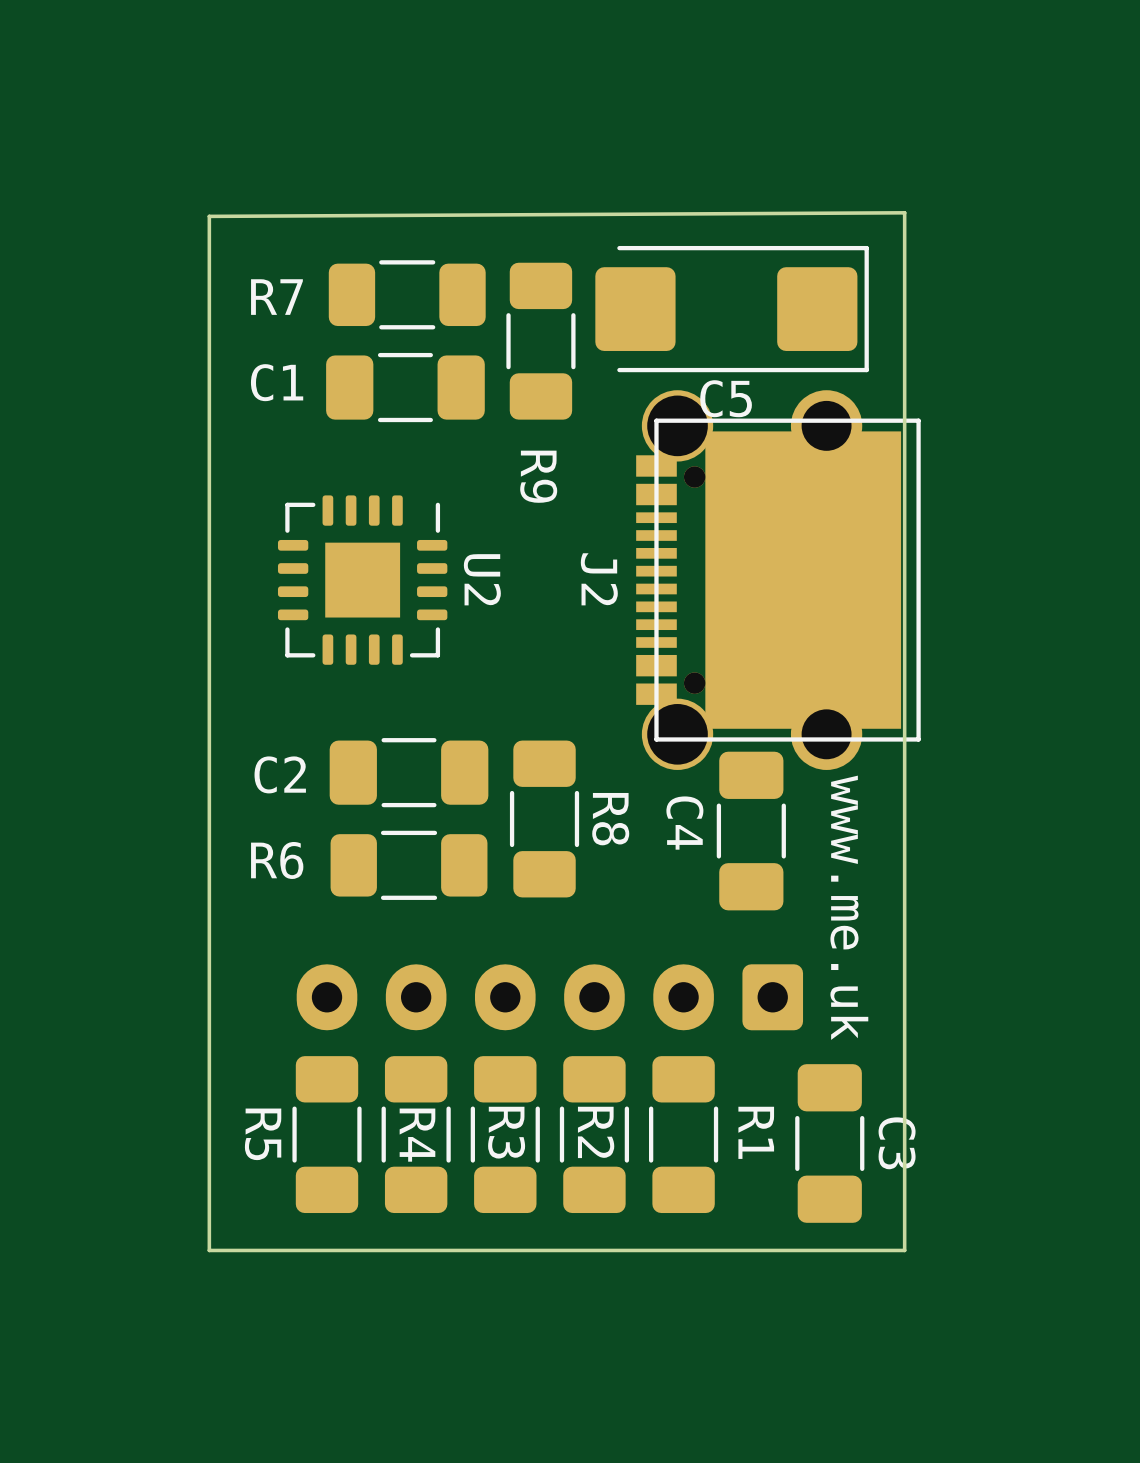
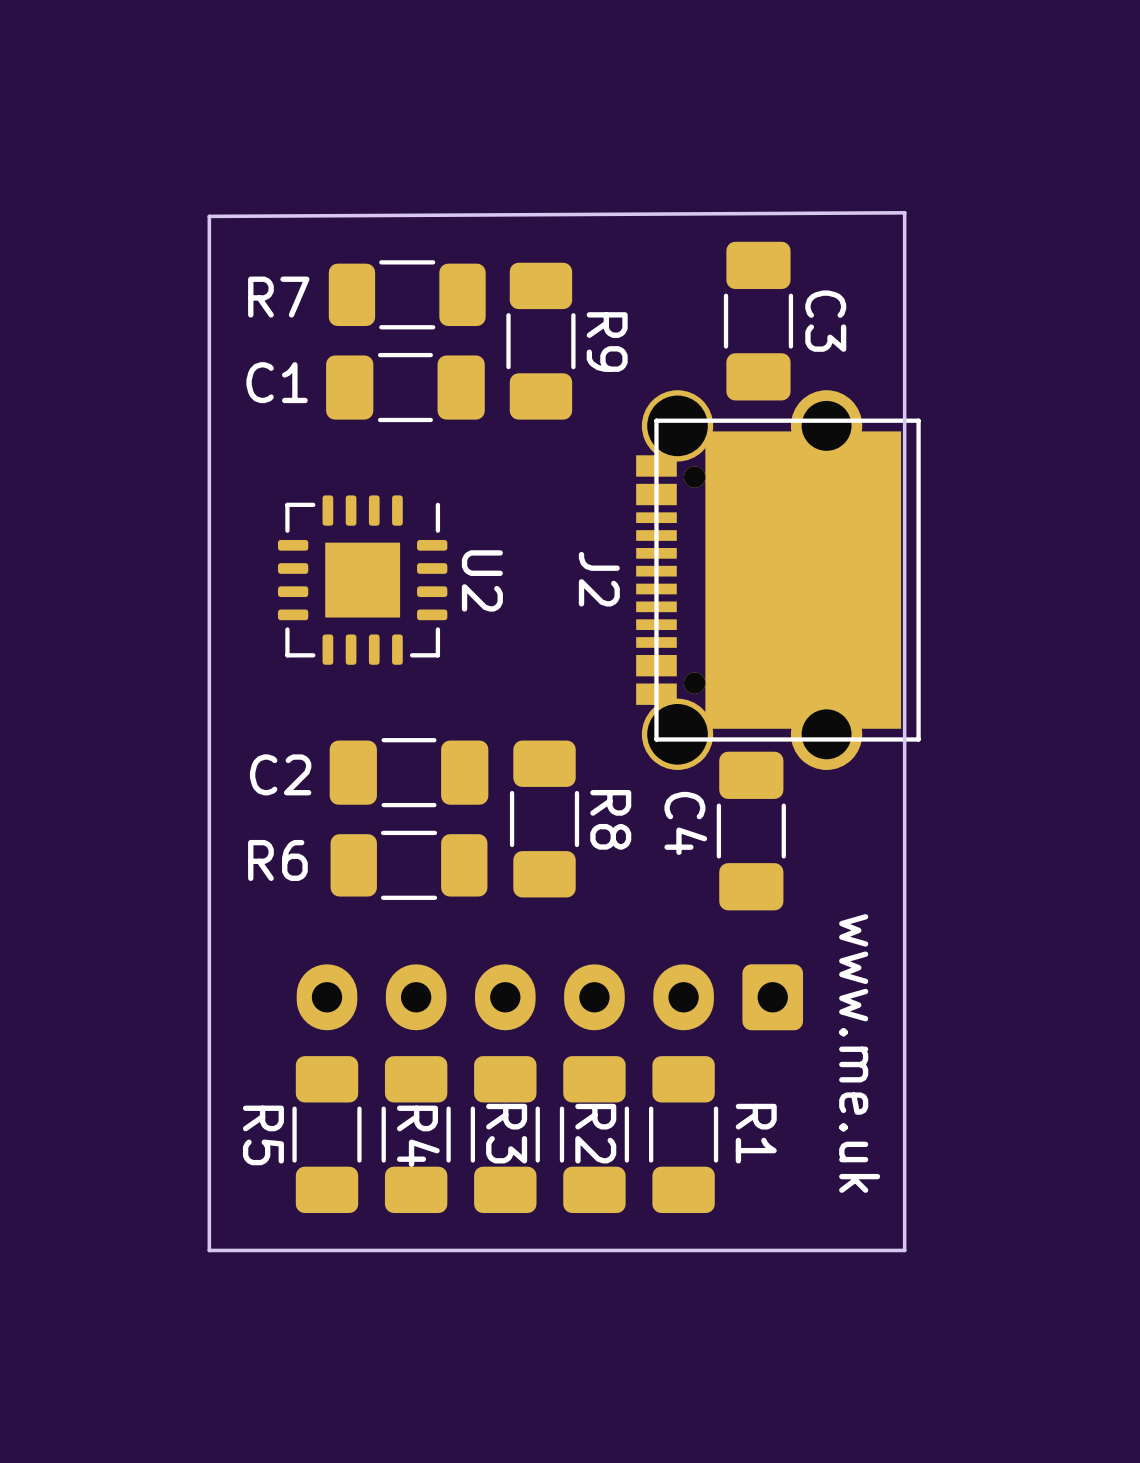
C5: (732, 309) -> none
R9 name position: R9 (538, 476) -> R9 (607, 342)
text position: www.me.uk (849, 907) -> www.me.uk (859, 1053)
C3 position: (829, 1143) -> (758, 321)

